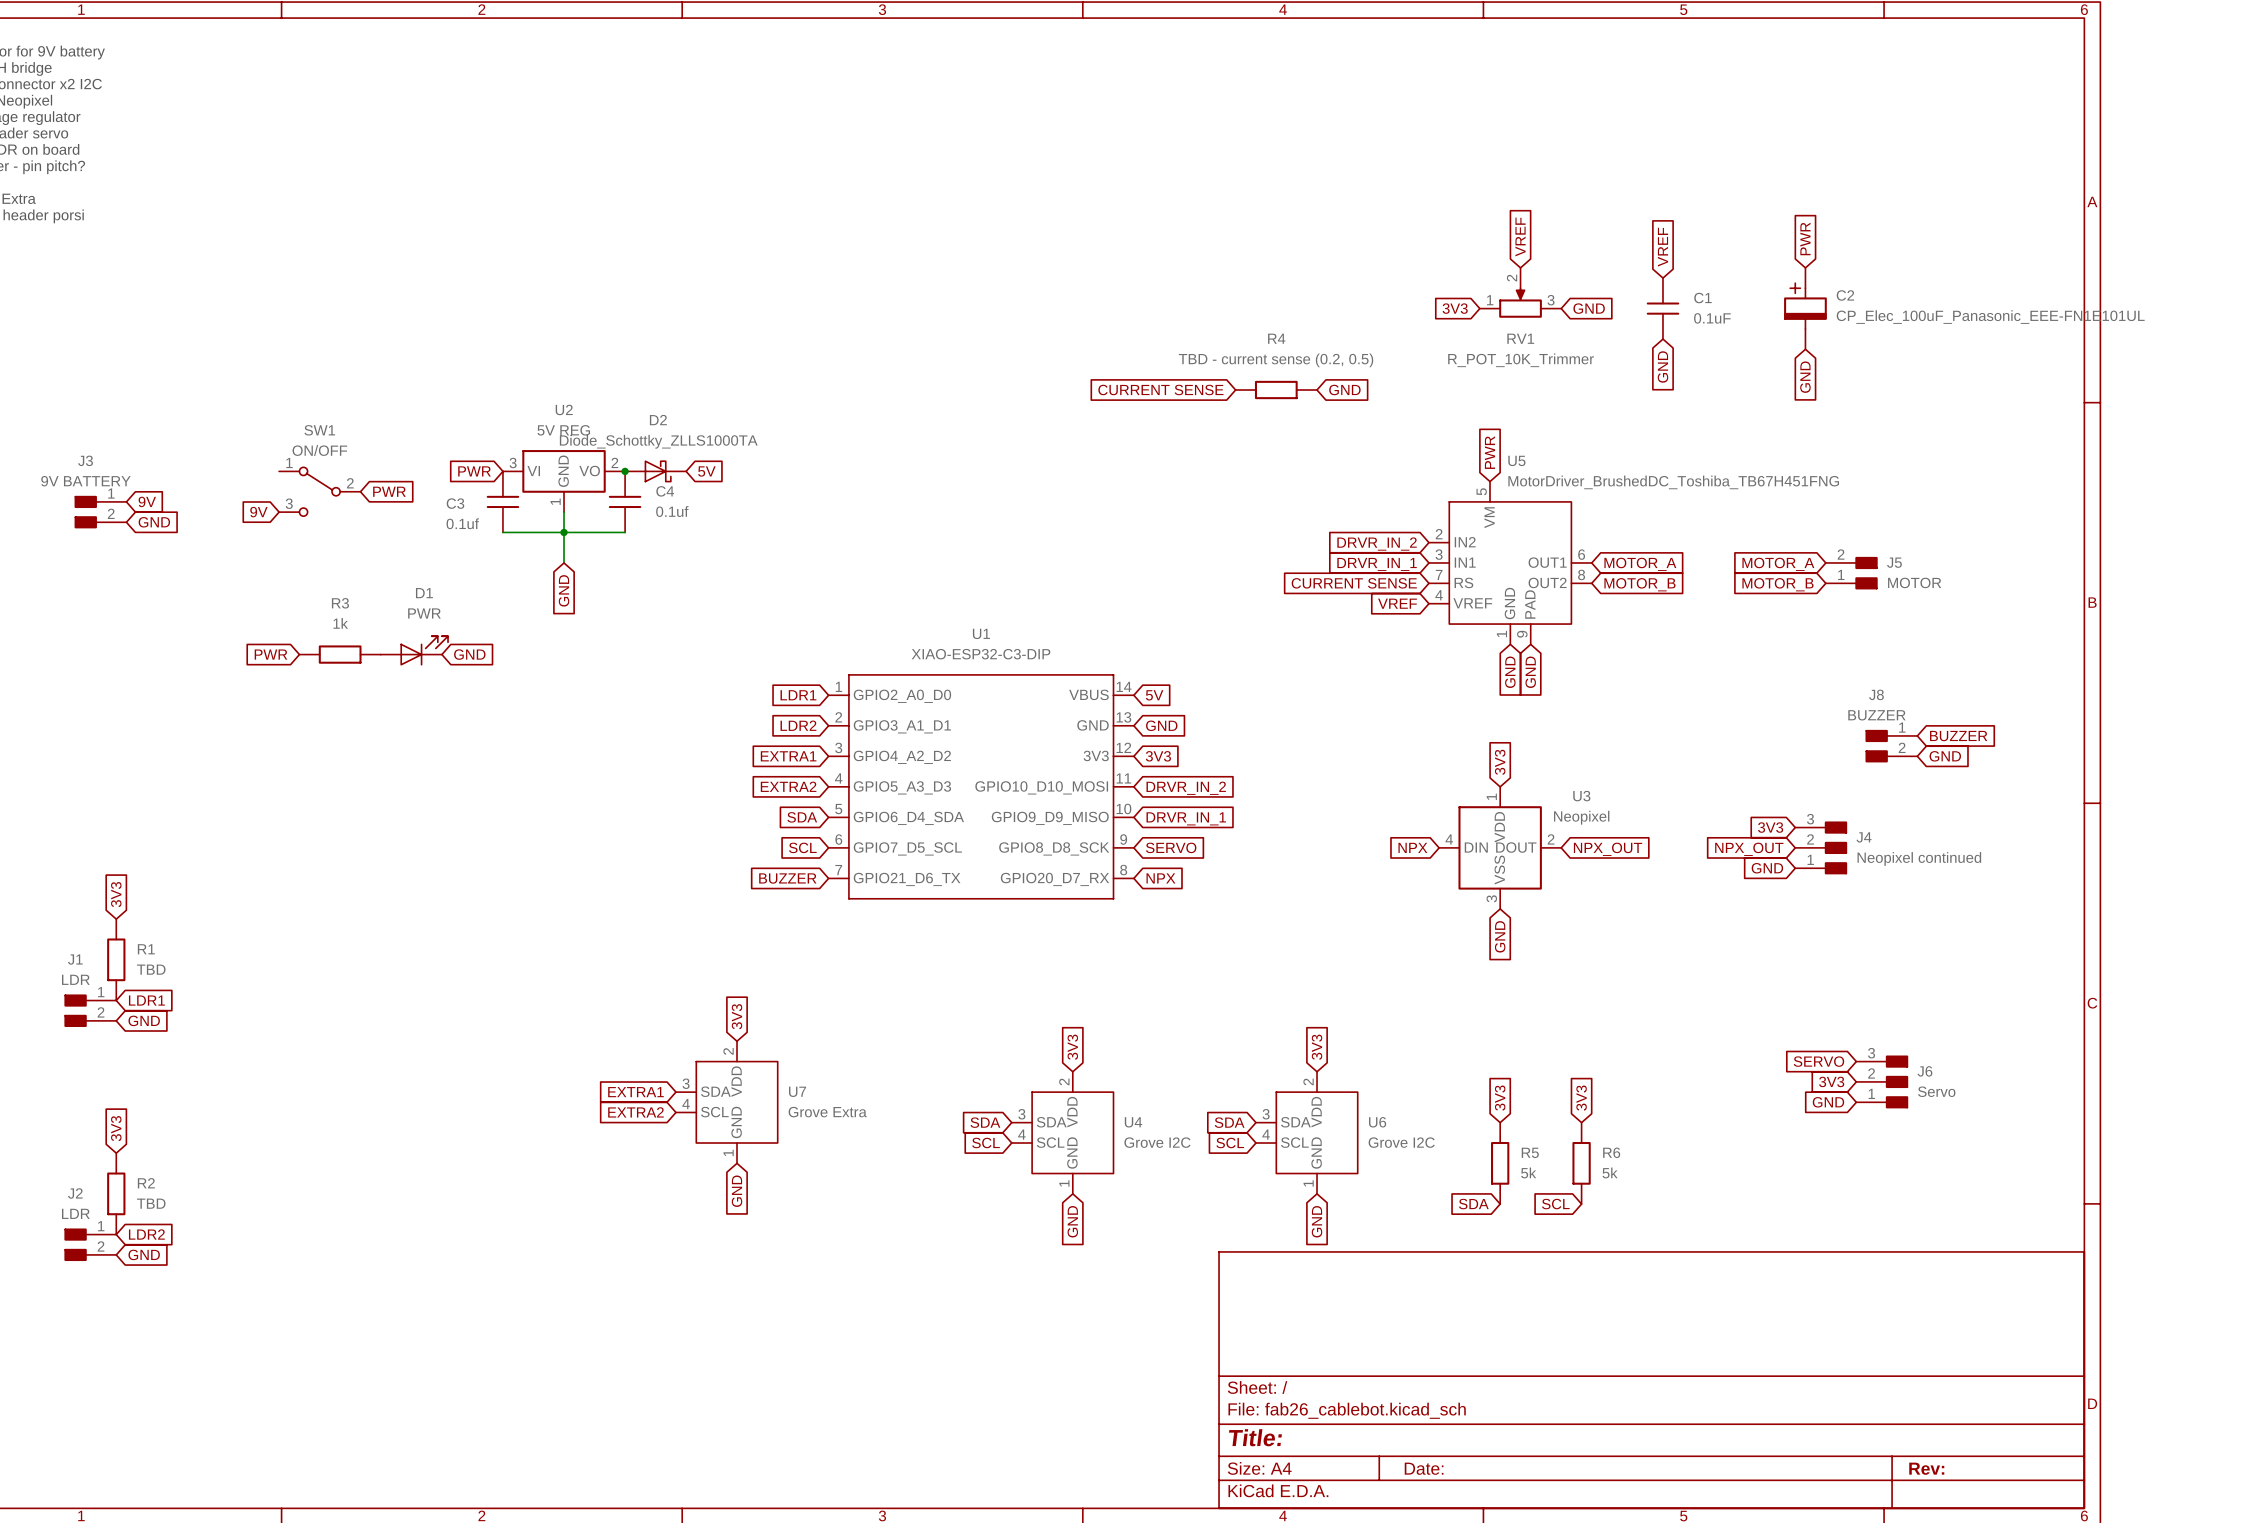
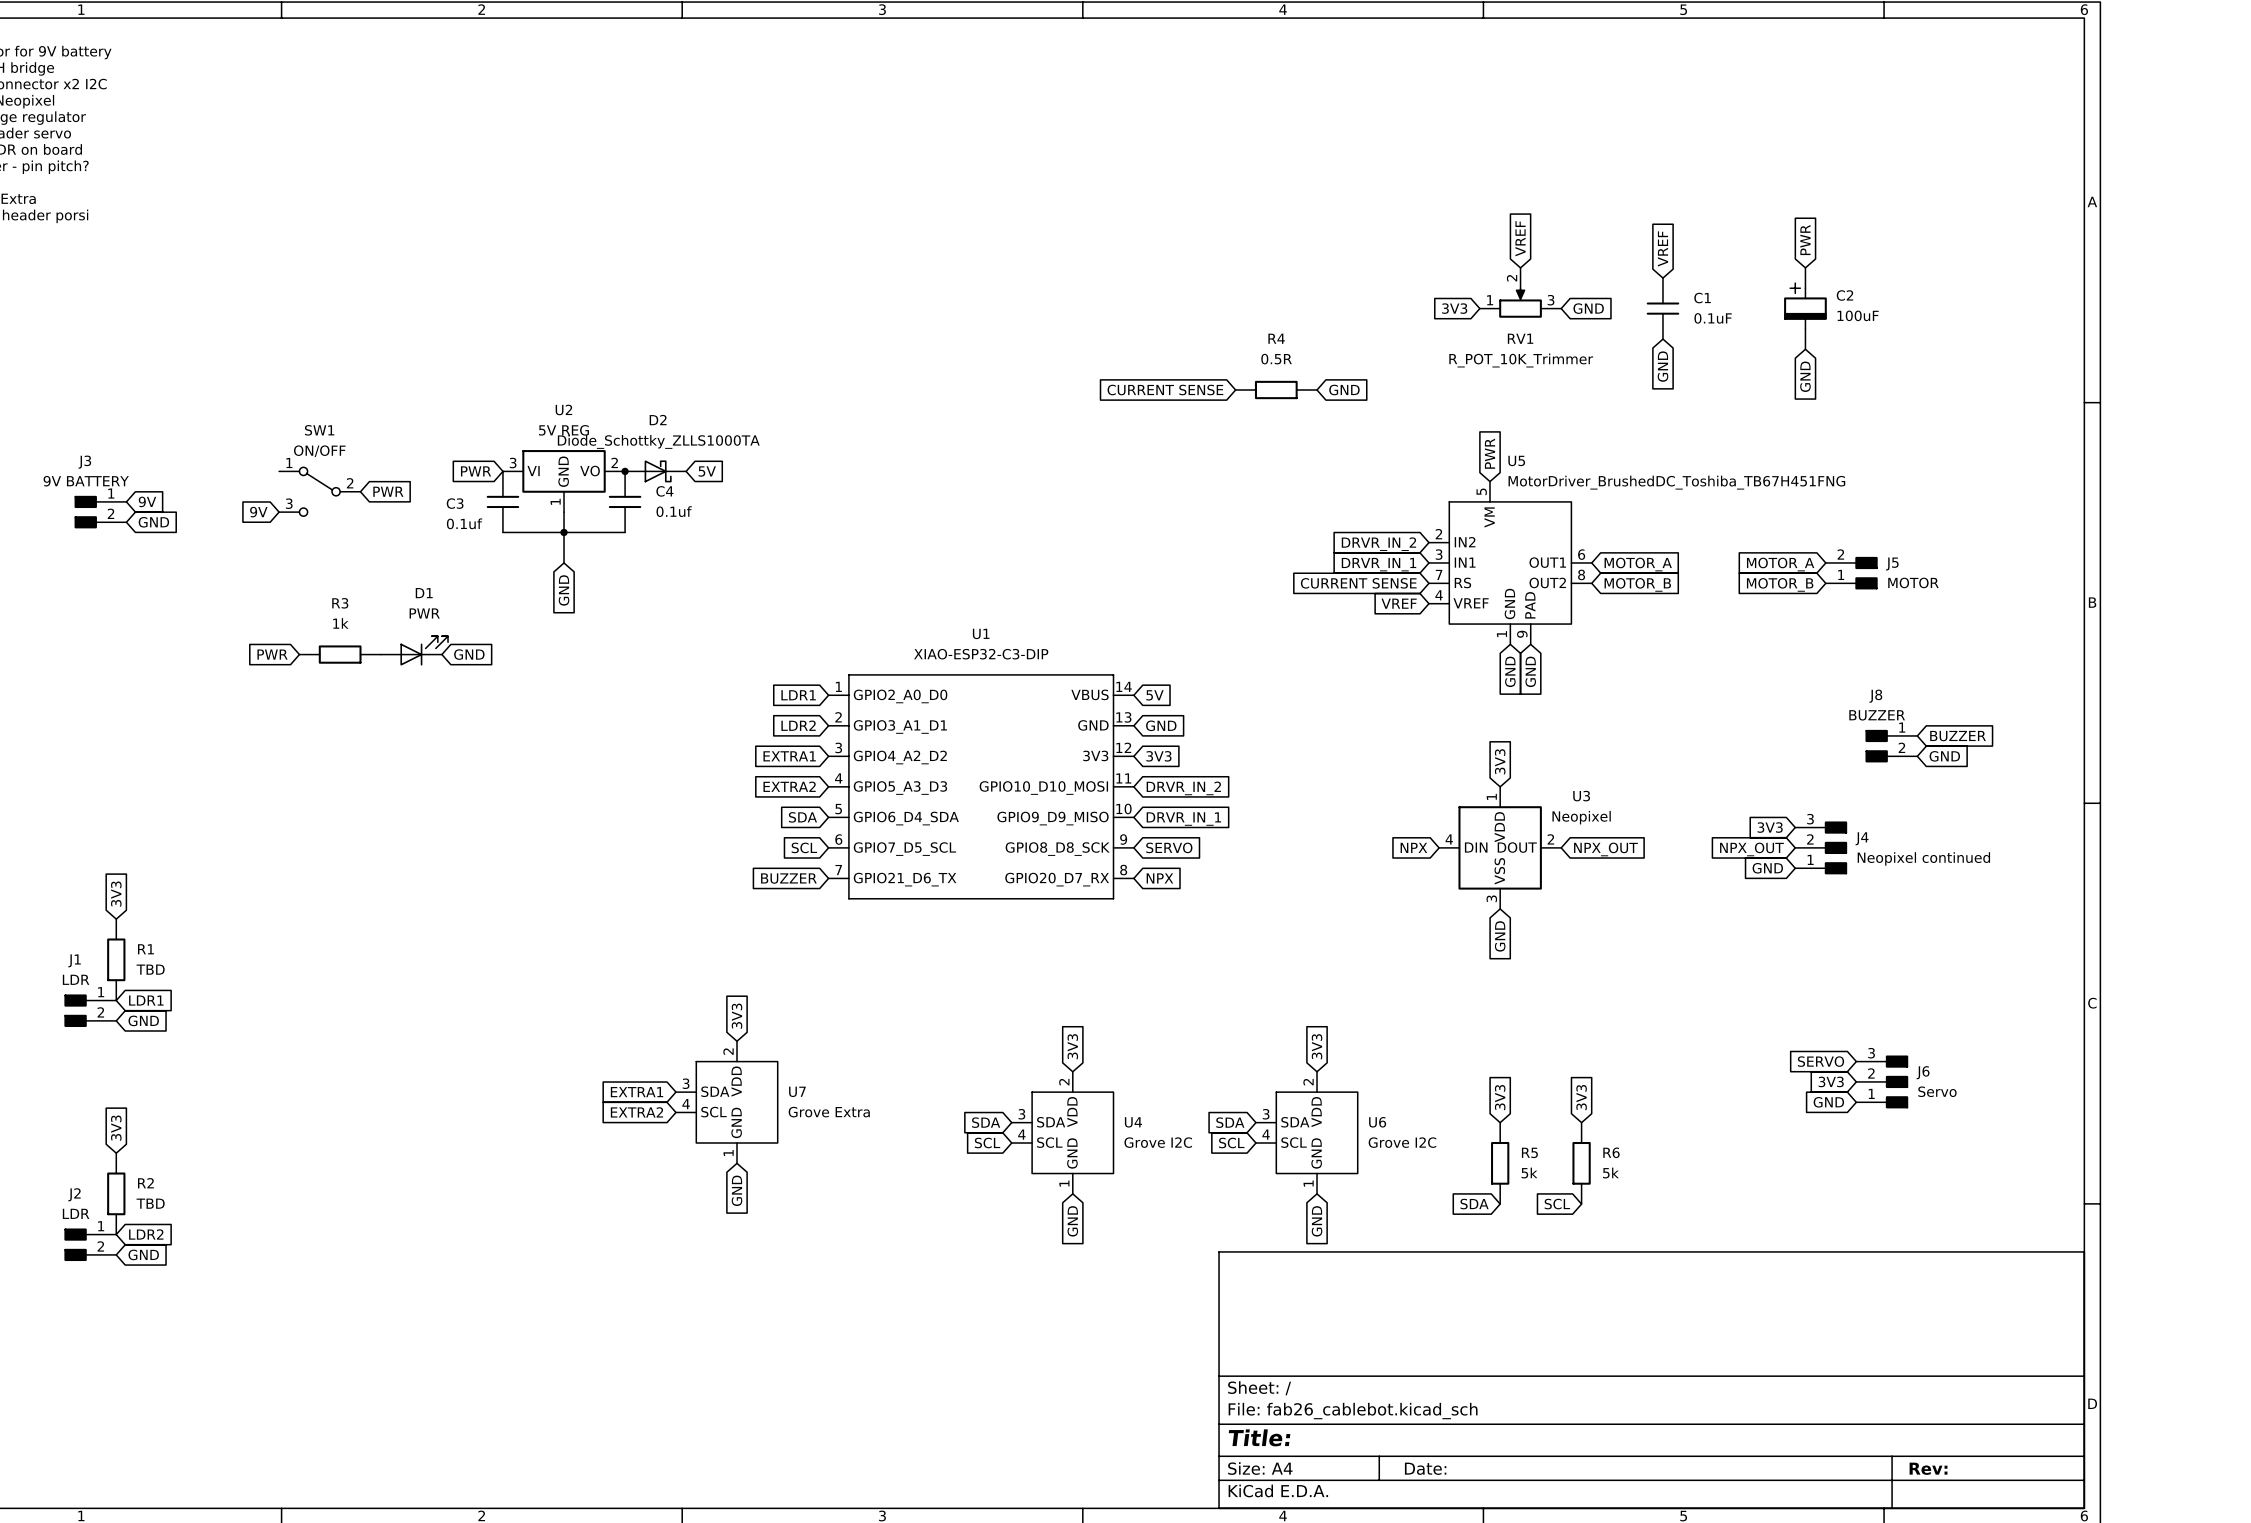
C2 value: CP_Elec_100uF_Panasonic_EEE-FN1E101UL (1990, 317) -> 100uF (1858, 315)
R4 value: TBD - current sense (0.2, 0.5) (1276, 360) -> 0.5R (1276, 359)

